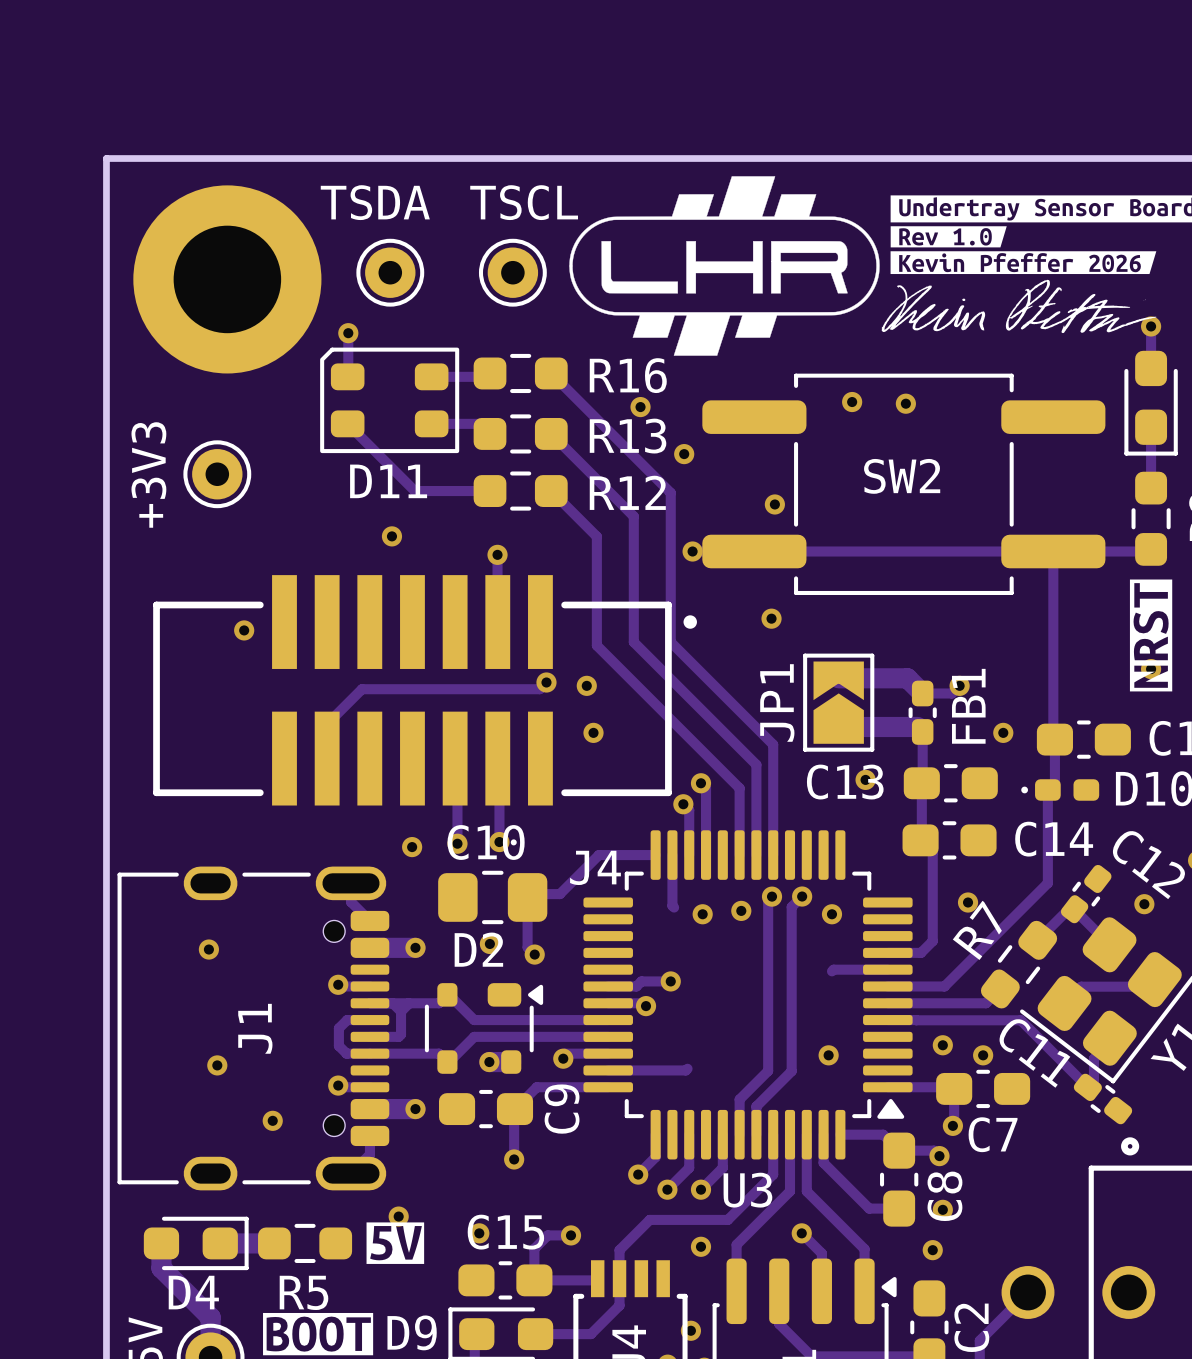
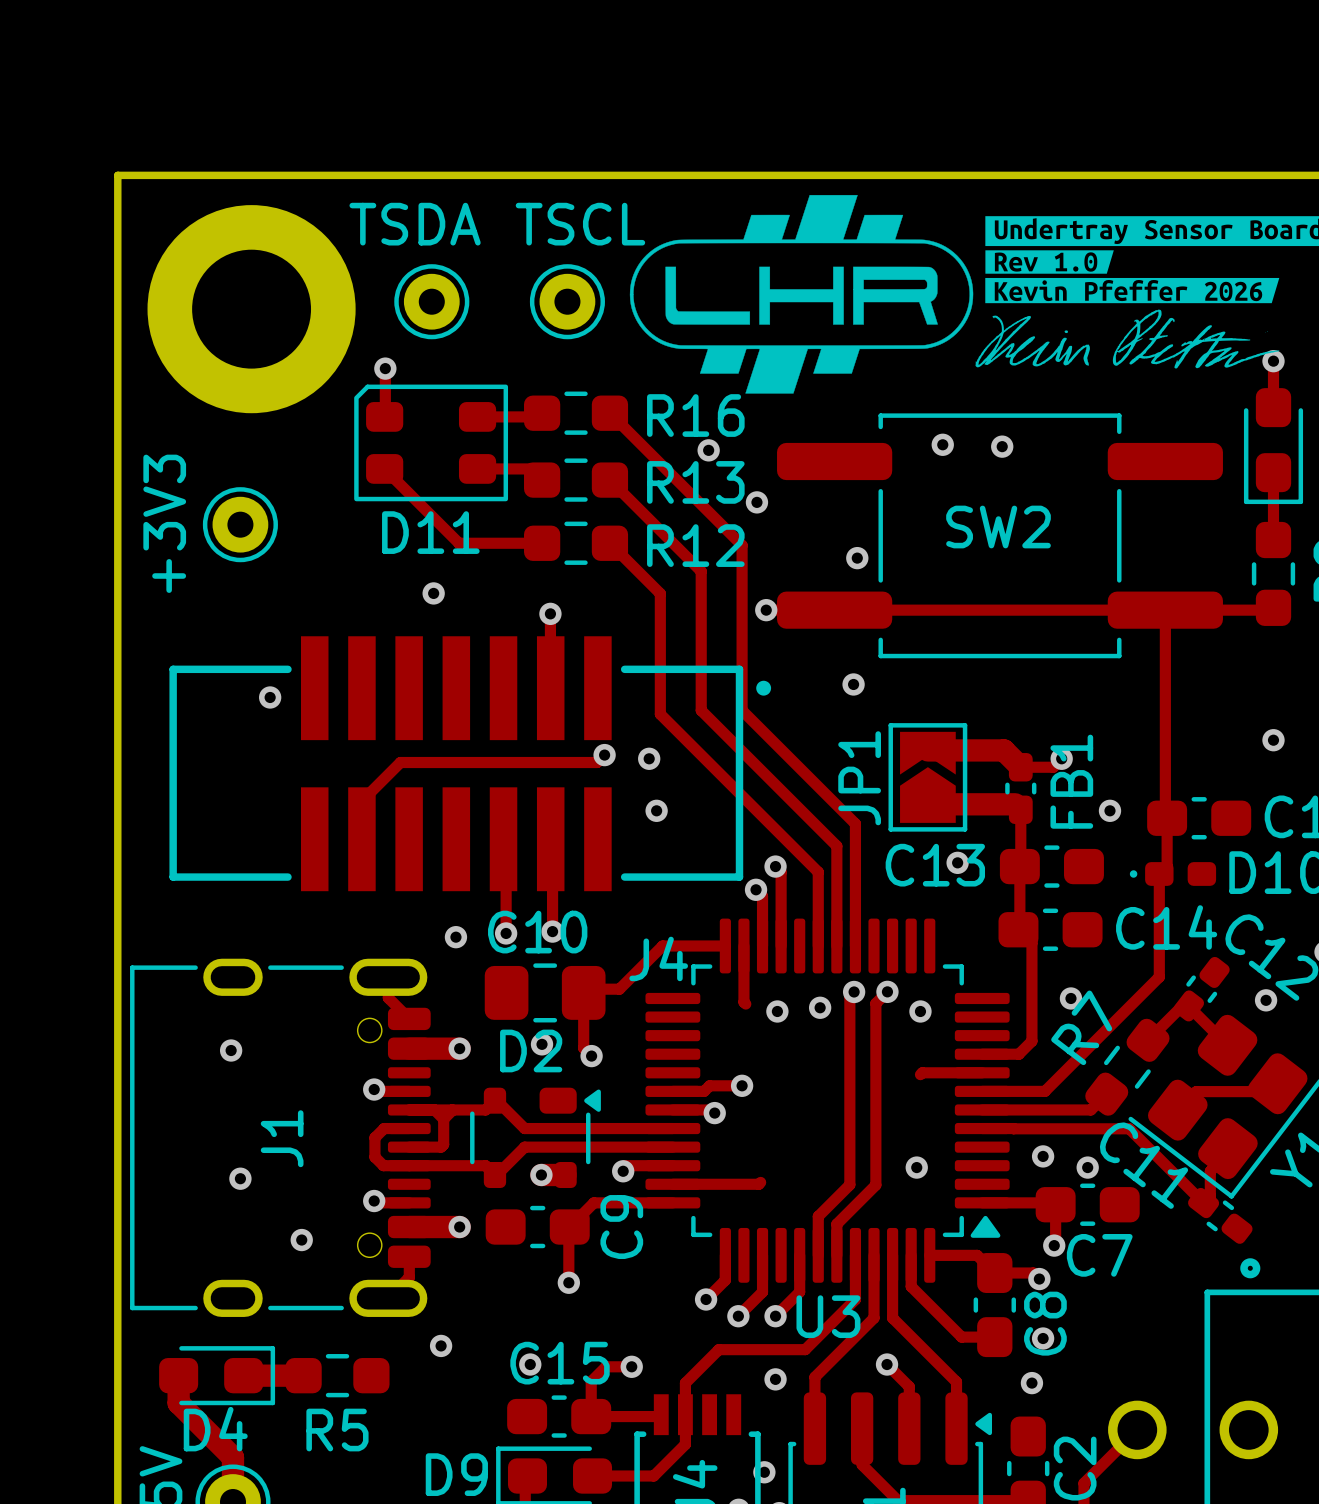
drawing: [1129, 579, 1173, 692] -> none
drawing: [366, 1222, 425, 1264] -> none
drawing: [263, 1312, 374, 1356] -> none

